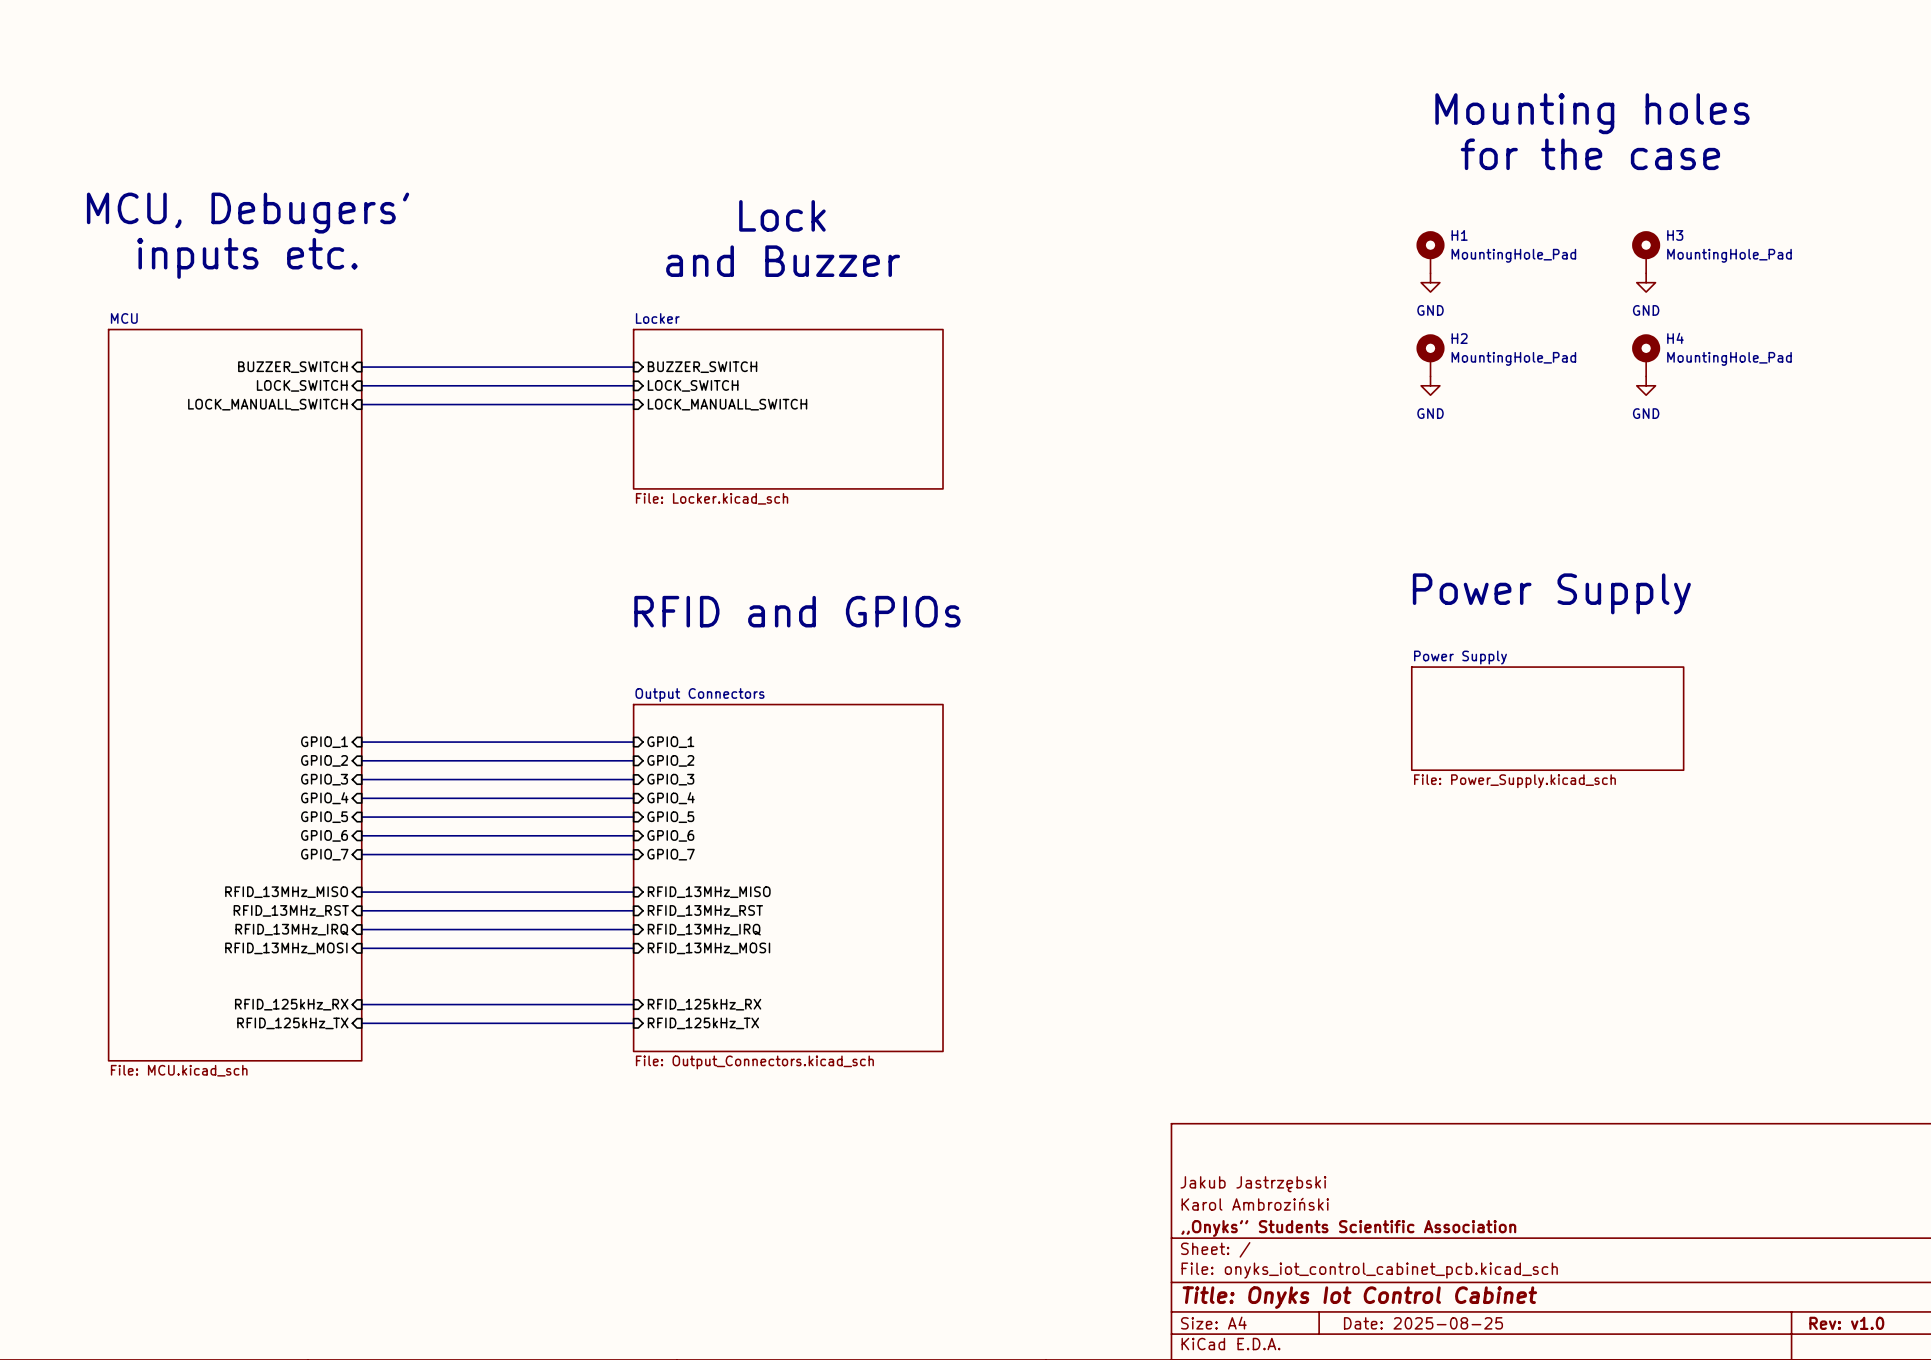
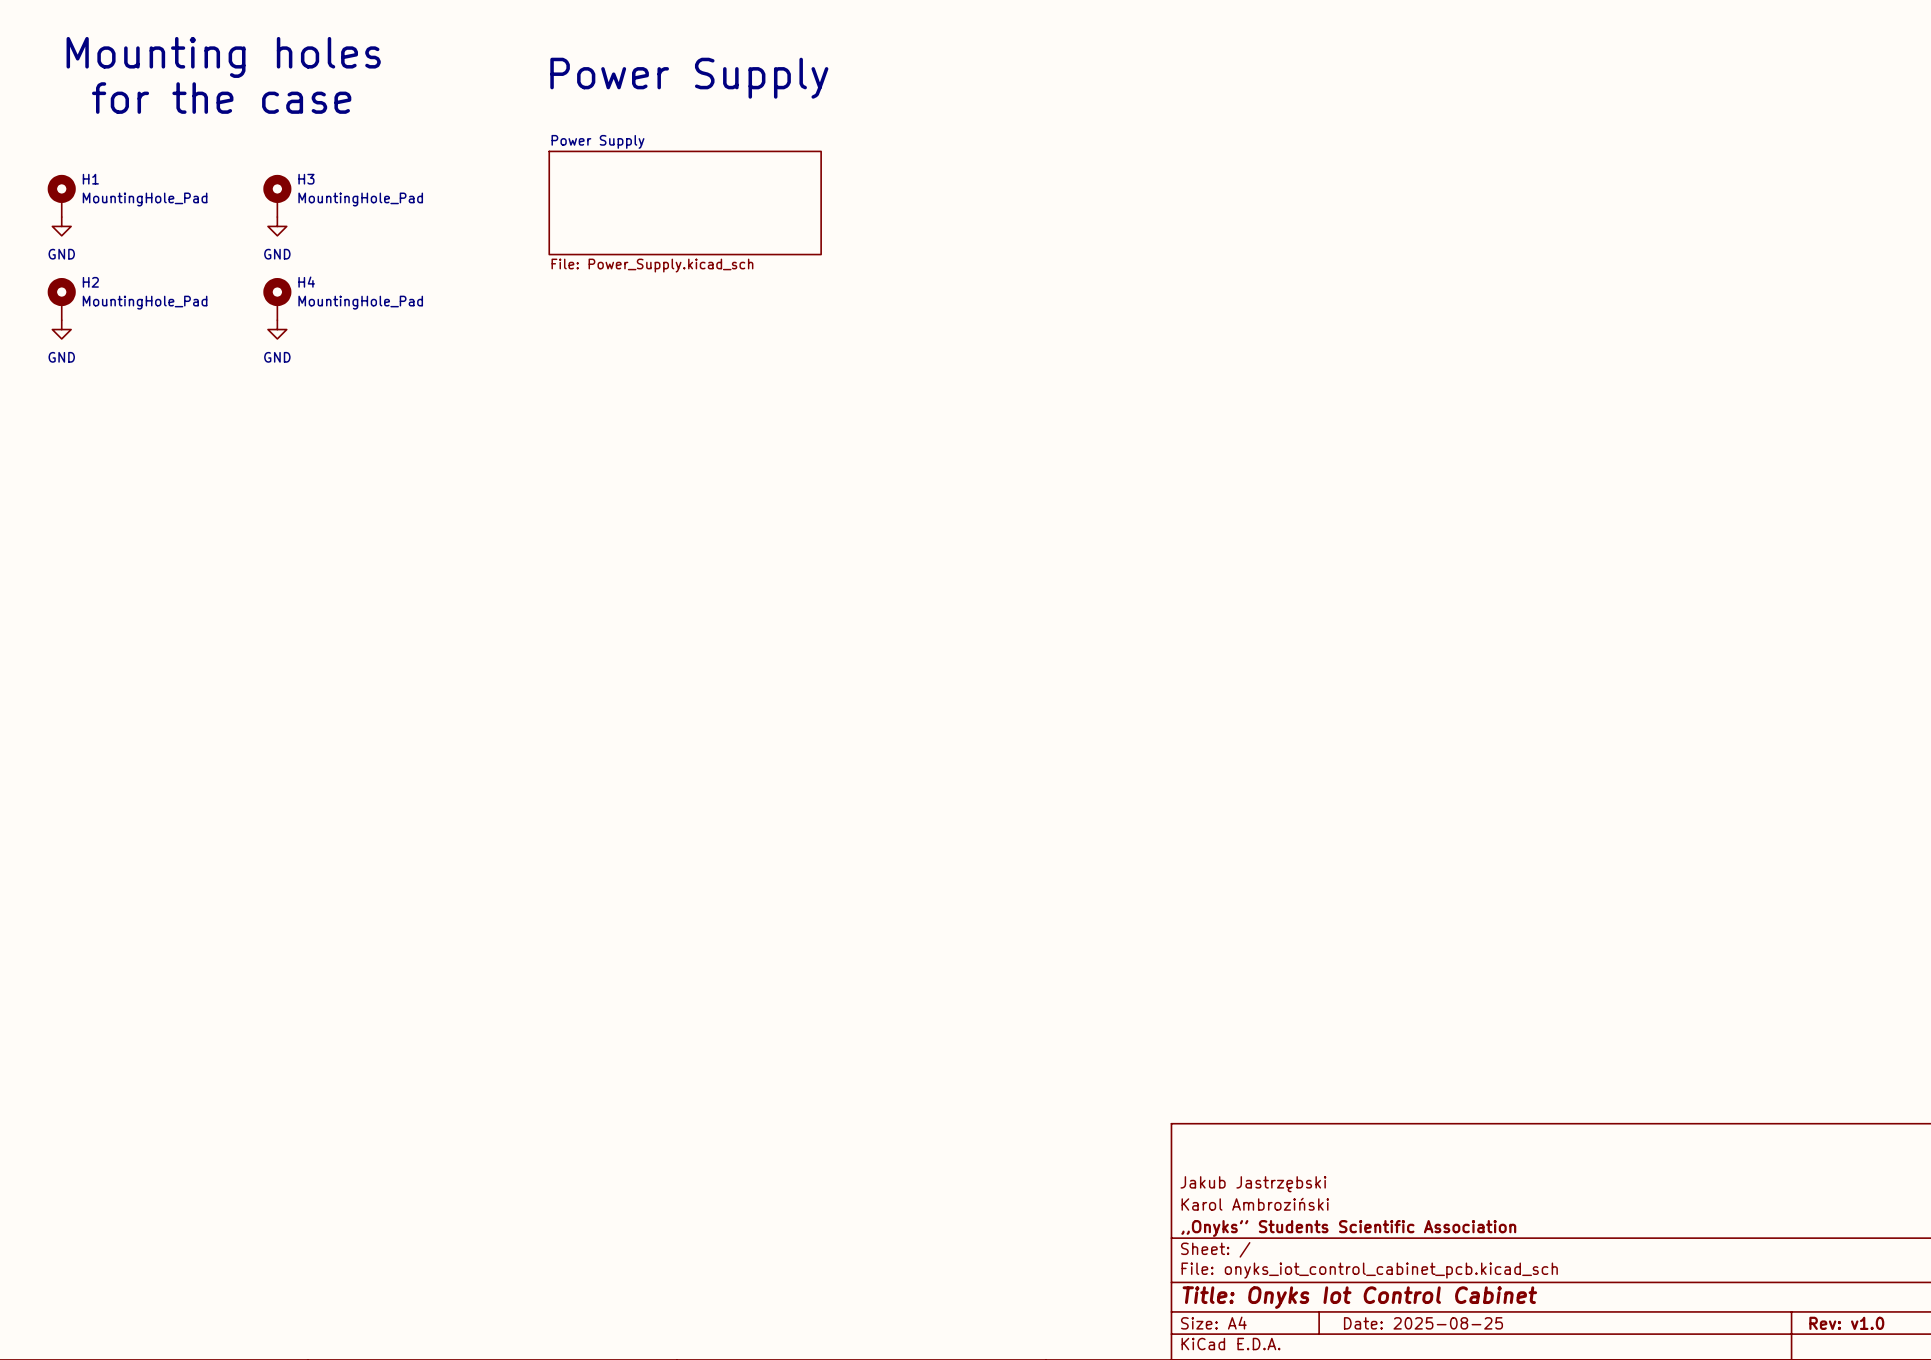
text: none -> Mounting holes (223, 57)
text: none -> Power Supply (689, 78)
text: none -> for the case (221, 98)
text: Mounting holes (1592, 113) -> none
text: for the case (1590, 154) -> none
sheet Power Supply: none -> File: Power_Supply.kicad_sch (685, 202)
text: MCU, Debugers' (248, 213) -> none
text: Lock (782, 215) -> none
power symbol: none -> GND (61, 226)
power symbol: none -> GND (277, 226)
H1 position: (1430, 252) -> (61, 195)
H3 position: (1646, 252) -> (277, 195)
text: inputs etc. (247, 258) -> none
text: and Buzzer (783, 261) -> none
power symbol: GND (1430, 282) -> none
power symbol: GND (1646, 282) -> none
power symbol: none -> GND (61, 329)
power symbol: none -> GND (277, 329)
H2 position: (1430, 355) -> (61, 299)
H4 position: (1646, 355) -> (277, 299)
sheet pin: BUZZER_SWITCH (292, 367) -> none
wire: (361, 367) (633, 367) -> none
sheet pin: BUZZER_SWITCH (702, 367) -> none
sheet pin: LOCK_SWITCH (302, 385) -> none
wire: (361, 385) (633, 385) -> none
sheet pin: LOCK_SWITCH (693, 385) -> none
power symbol: GND (1430, 385) -> none
power symbol: GND (1646, 385) -> none
sheet pin: LOCK_MANUALL_SWITCH (267, 404) -> none
wire: (361, 404) (633, 404) -> none
sheet pin: LOCK_MANUALL_SWITCH (727, 404) -> none
sheet Locker: File: Locker.kicad_sch (788, 409) -> none
text: Power Supply (1551, 593) -> none
text: RFID and GPIOs (797, 611) -> none
sheet MCU: File: MCU.kicad_sch (235, 695) -> none
sheet Power Supply: File: Power_Supply.kicad_sch (1547, 718) -> none
sheet pin: GPIO_1 (324, 742) -> none
wire: (361, 742) (633, 742) -> none
sheet pin: GPIO_1 (670, 742) -> none
sheet pin: GPIO_2 (324, 760) -> none
wire: (361, 760) (633, 760) -> none
sheet pin: GPIO_2 (670, 760) -> none
sheet pin: GPIO_3 (324, 779) -> none
wire: (361, 779) (633, 779) -> none
sheet pin: GPIO_3 (670, 779) -> none
sheet pin: GPIO_4 (324, 798) -> none
wire: (361, 798) (633, 798) -> none
sheet pin: GPIO_4 (671, 798) -> none
sheet pin: GPIO_5 (324, 817) -> none
wire: (361, 817) (633, 817) -> none
sheet pin: GPIO_5 (670, 817) -> none
sheet pin: GPIO_6 (324, 835) -> none
wire: (361, 835) (633, 835) -> none
sheet pin: GPIO_6 (670, 835) -> none
sheet pin: GPIO_7 (324, 854) -> none
wire: (361, 854) (633, 854) -> none
sheet pin: GPIO_7 (671, 854) -> none
sheet Output Connectors: File: Output_Connectors.kicad_sch (788, 878) -> none
sheet pin: RFID_13MHz_MISO (286, 892) -> none
wire: (361, 892) (633, 892) -> none
sheet pin: RFID_13MHz_MISO (709, 892) -> none
sheet pin: RFID_13MHz_RST (291, 910) -> none
wire: (361, 910) (633, 910) -> none
sheet pin: RFID_13MHz_RST (705, 910) -> none
sheet pin: RFID_13MHz_IRQ (291, 929) -> none
wire: (361, 929) (633, 929) -> none
sheet pin: RFID_13MHz_IRQ (704, 929) -> none
sheet pin: RFID_13MHz_MOSI (286, 948) -> none
wire: (361, 948) (633, 948) -> none
sheet pin: RFID_13MHz_MOSI (708, 948) -> none
sheet pin: RFID_125kHz_RX (291, 1004) -> none
wire: (361, 1004) (633, 1004) -> none
sheet pin: RFID_125kHz_RX (704, 1004) -> none
sheet pin: RFID_125kHz_TX (292, 1023) -> none
wire: (361, 1023) (633, 1023) -> none
sheet pin: RFID_125kHz_TX (703, 1023) -> none

